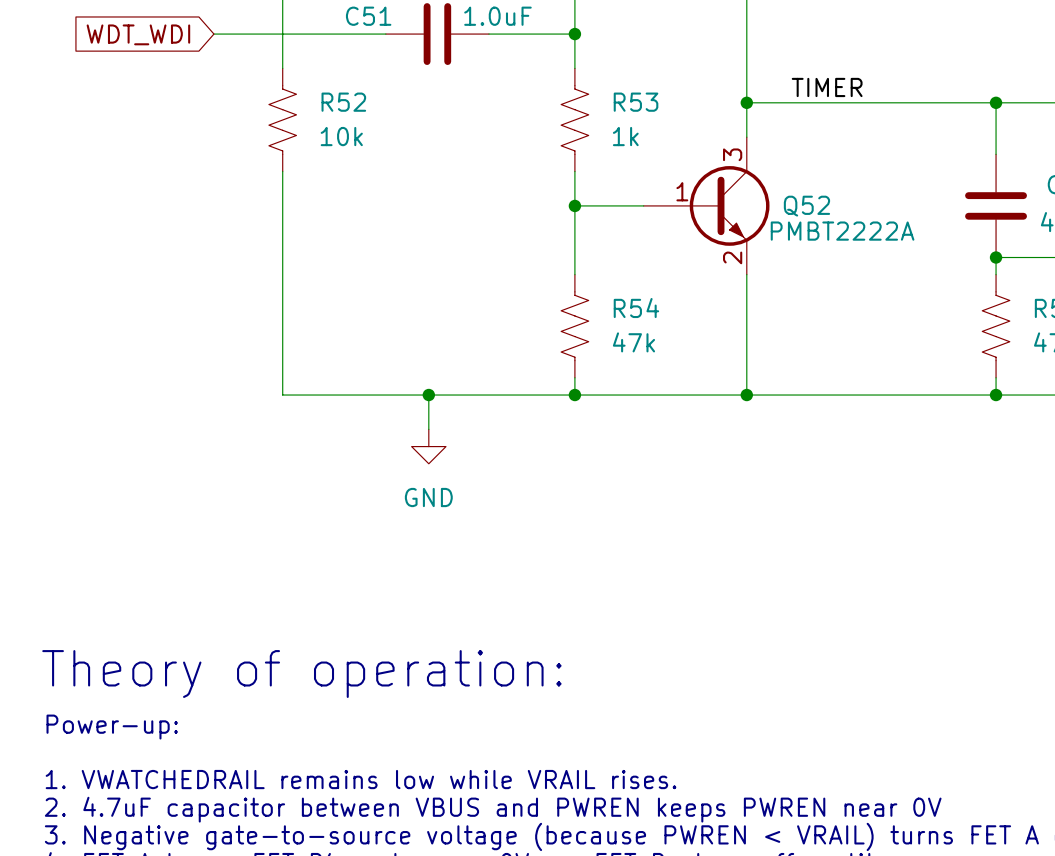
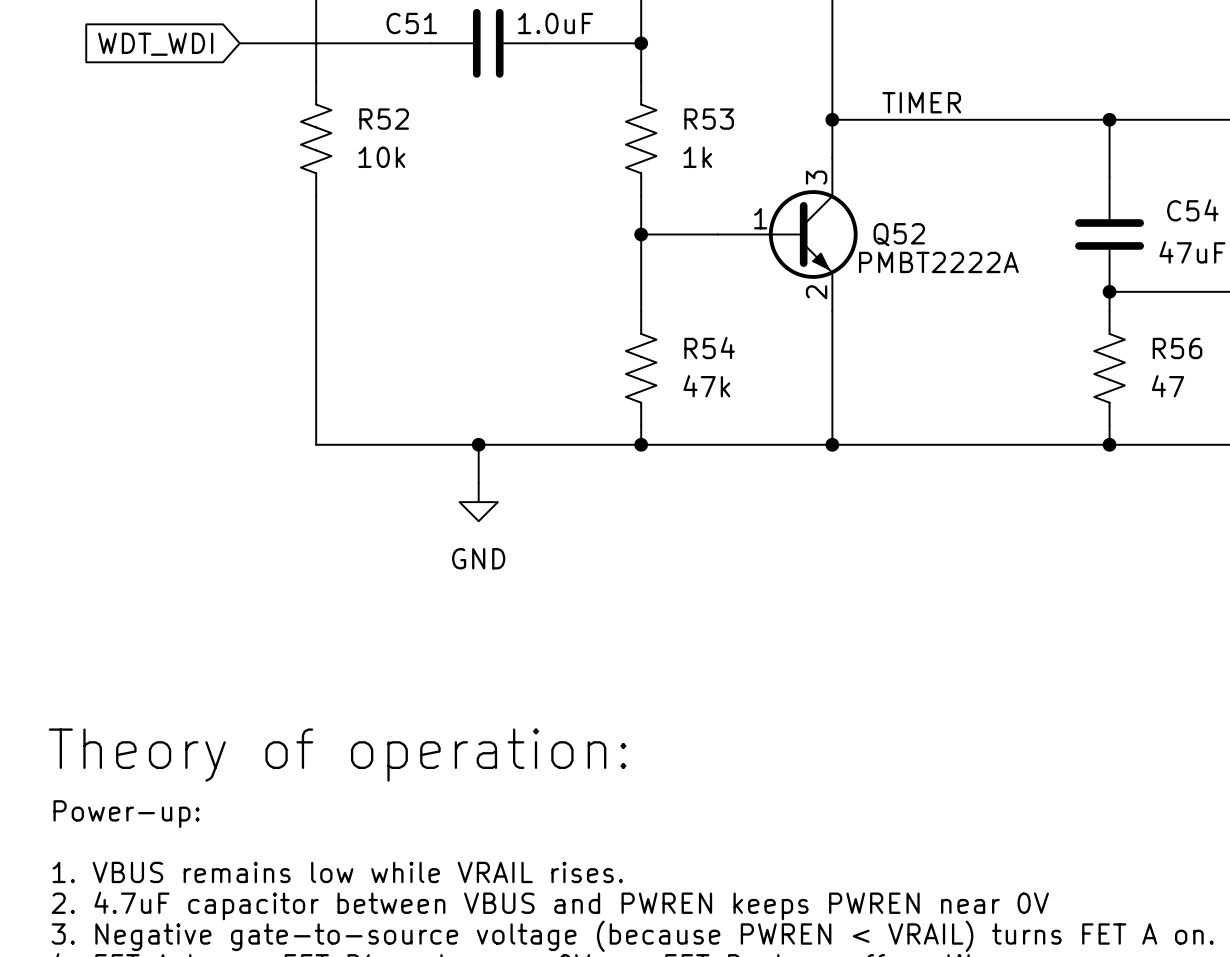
text: 1. VWATCHEDRAIL remains low while VRAIL rises. (361, 779) -> 1. VBUS remains low while VRAIL rises. (337, 872)

